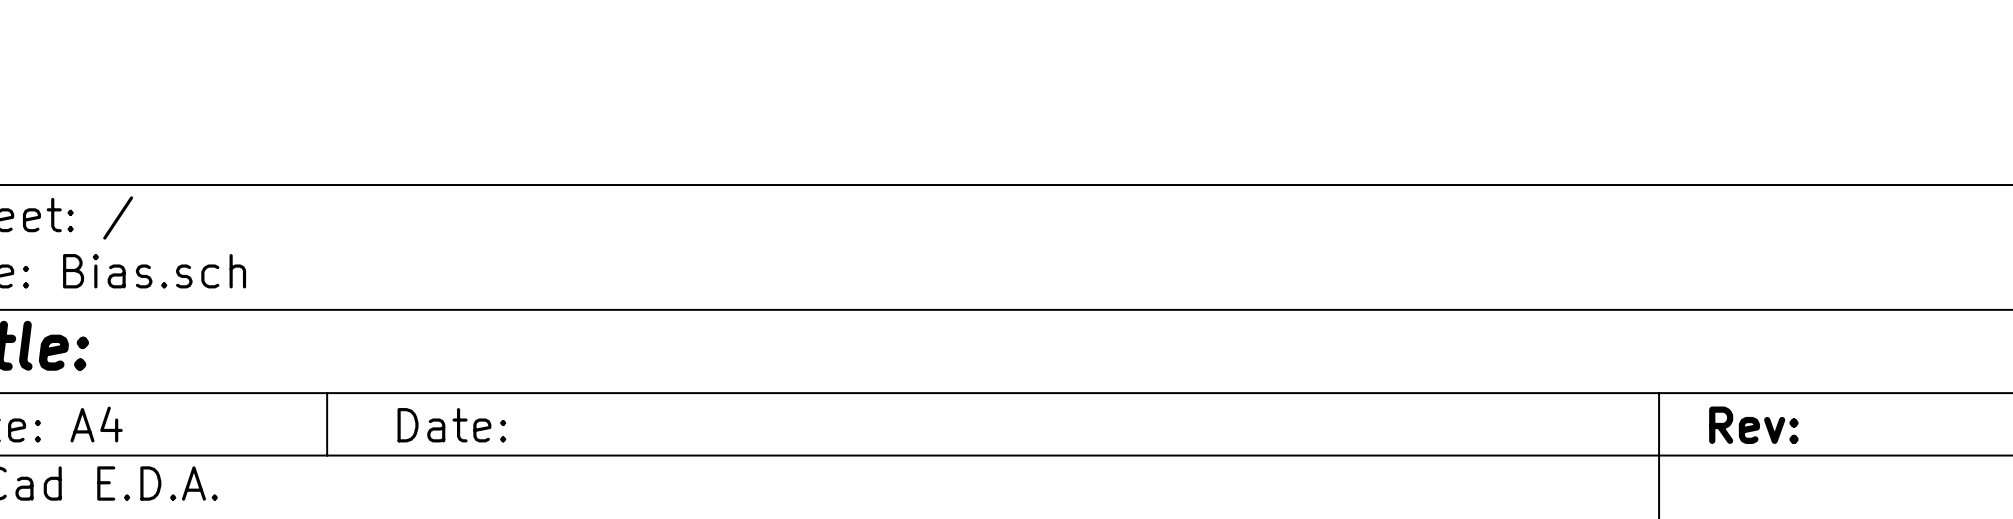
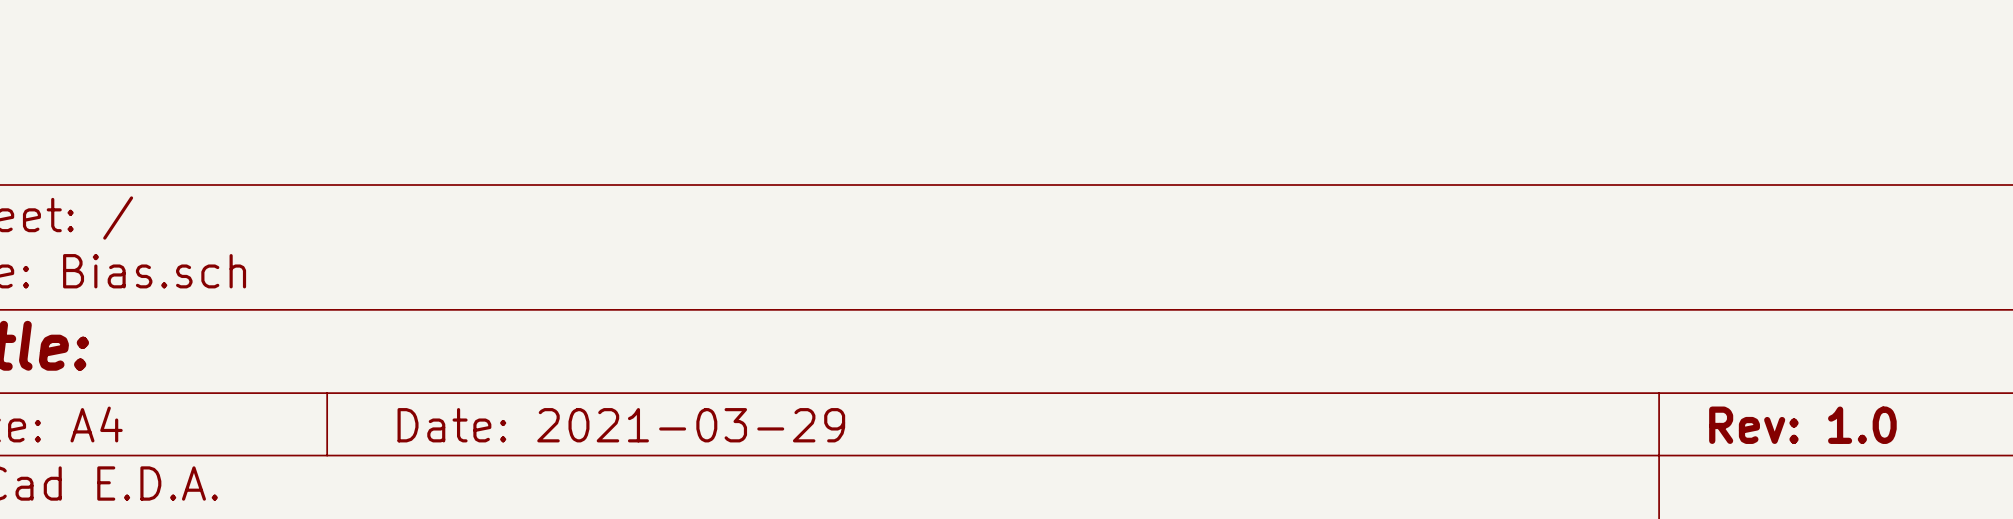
title block: Date: (451, 425) -> Date: 2021-03-29 (621, 425)
title block: Rev: (1753, 425) -> Rev: 1.0 (1802, 425)

